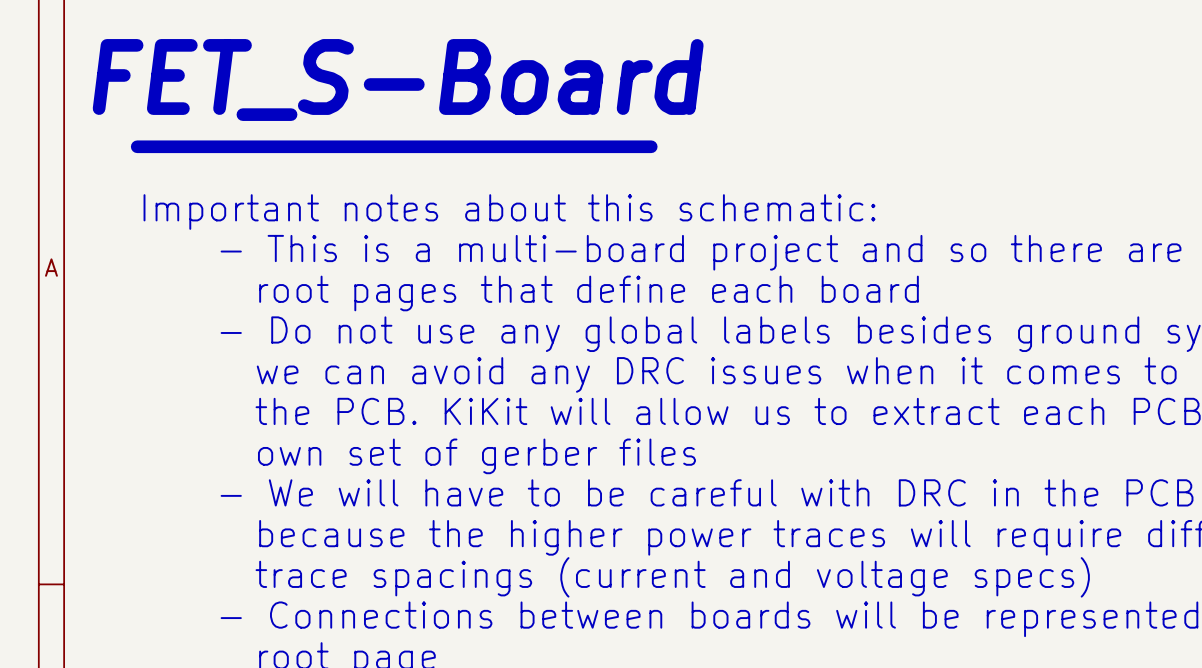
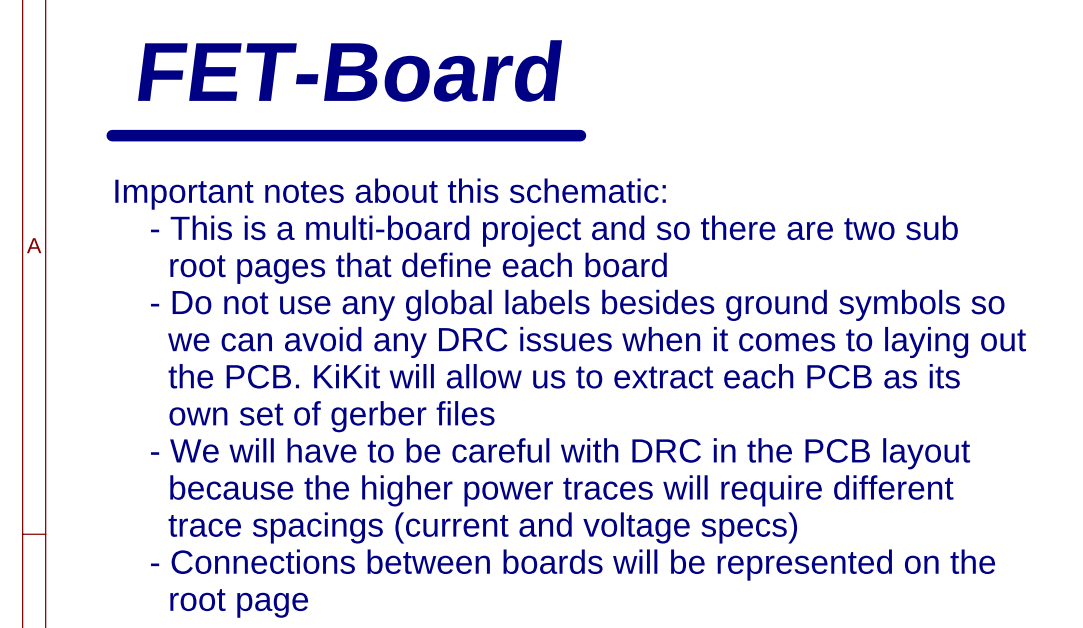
text: FET_S-Board (398, 79) -> FET-Board (350, 70)

